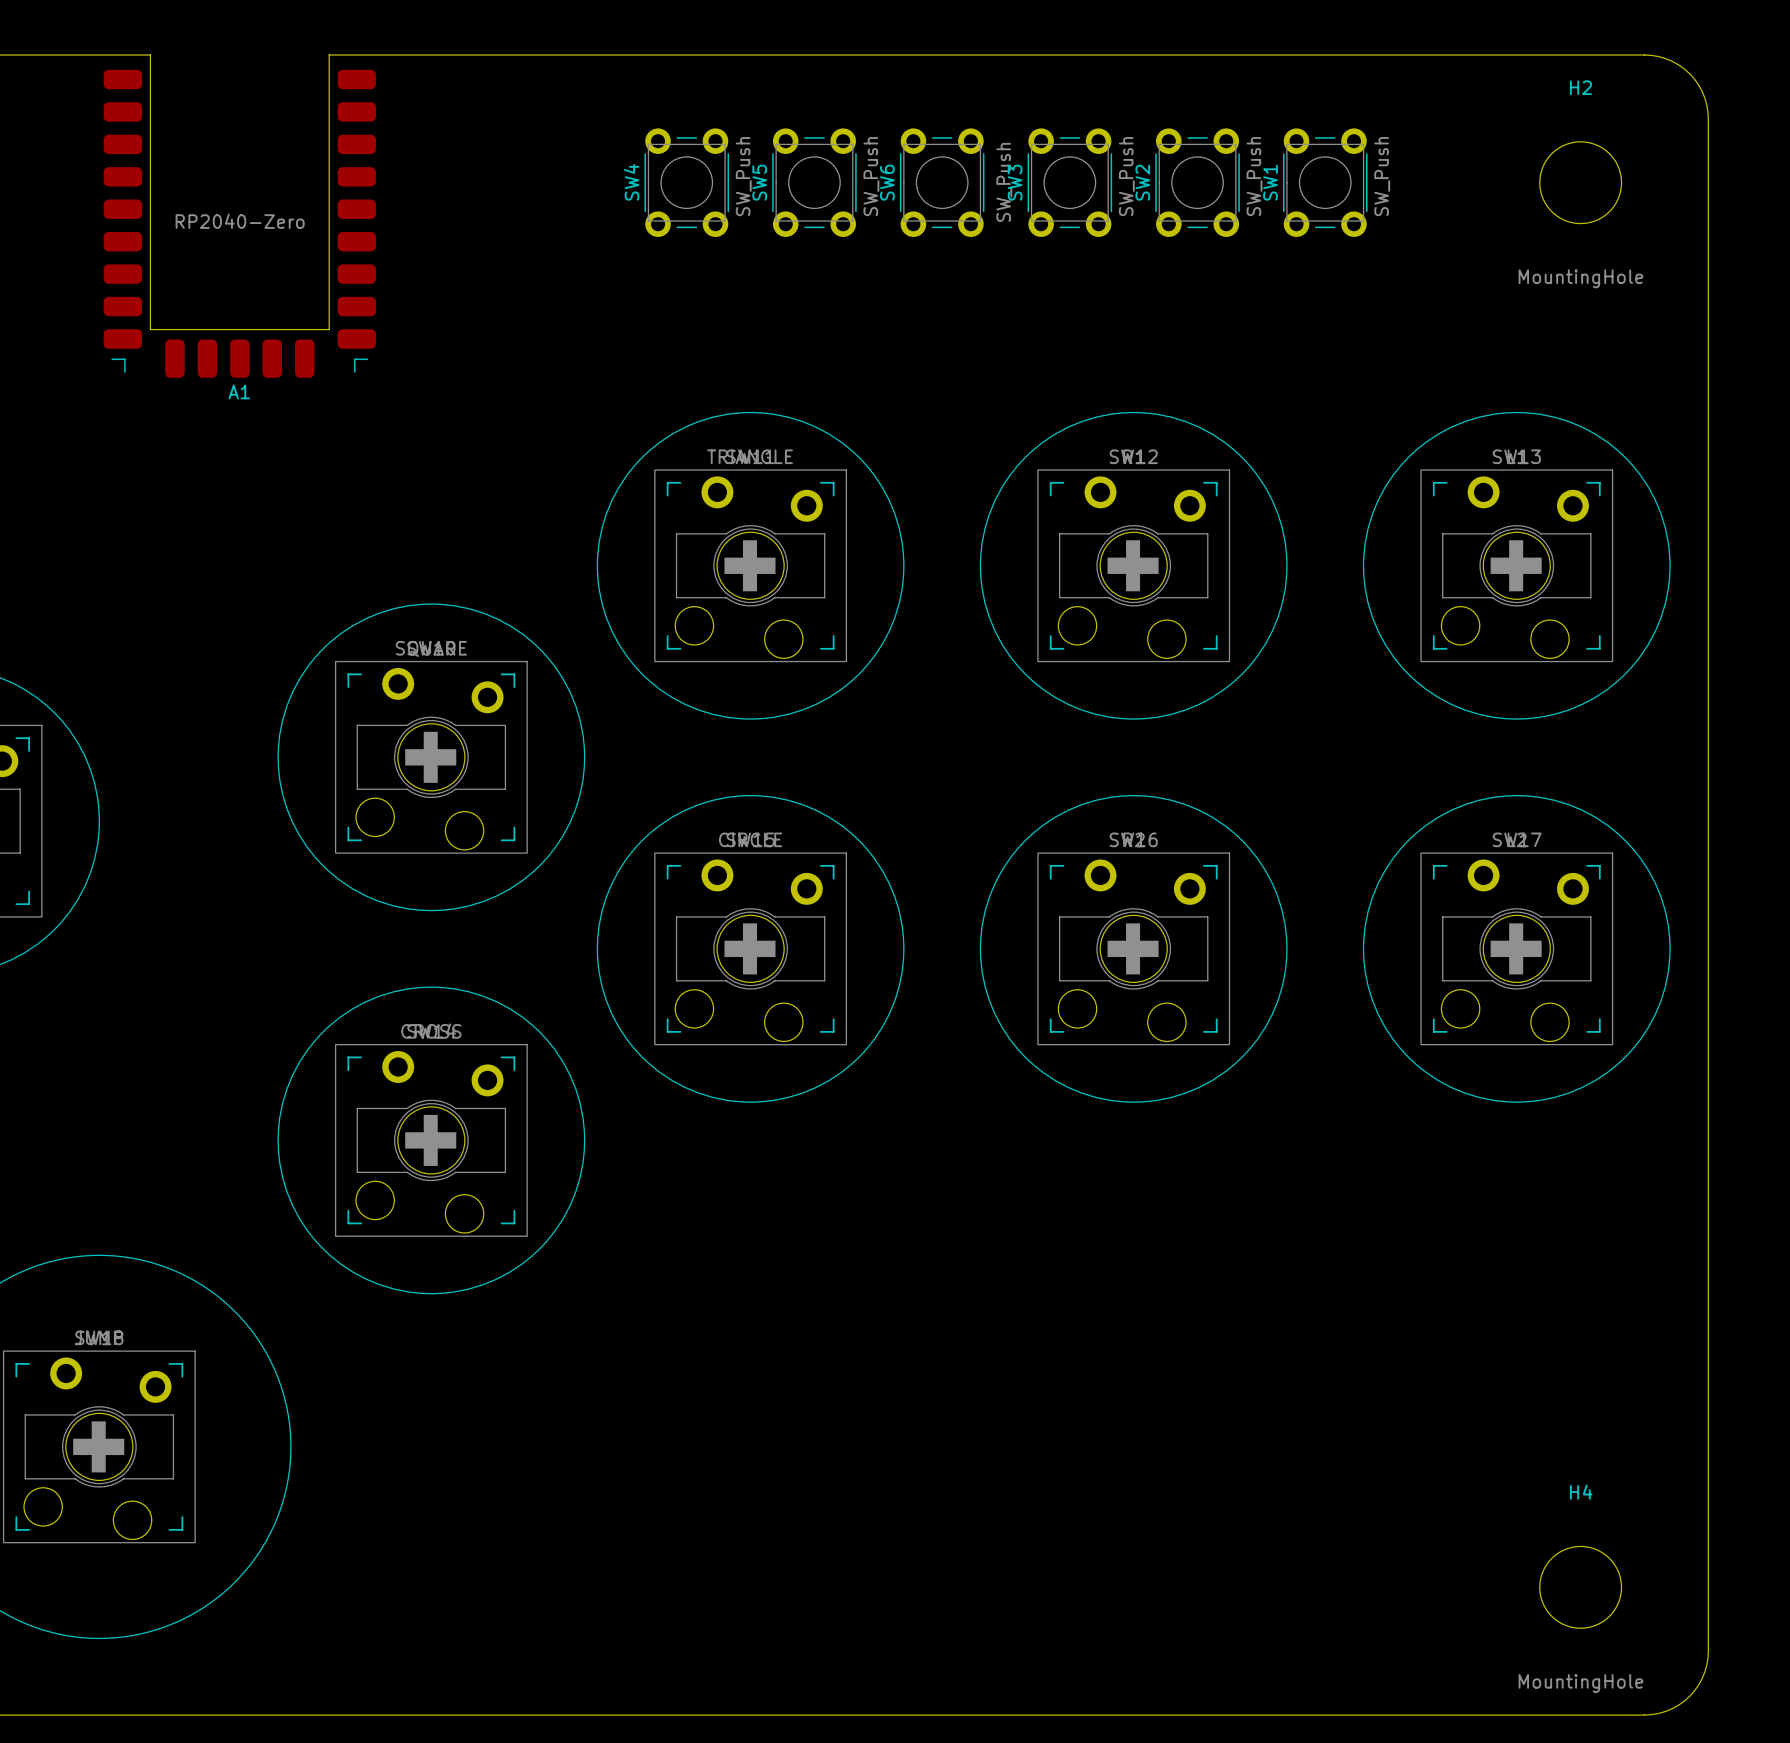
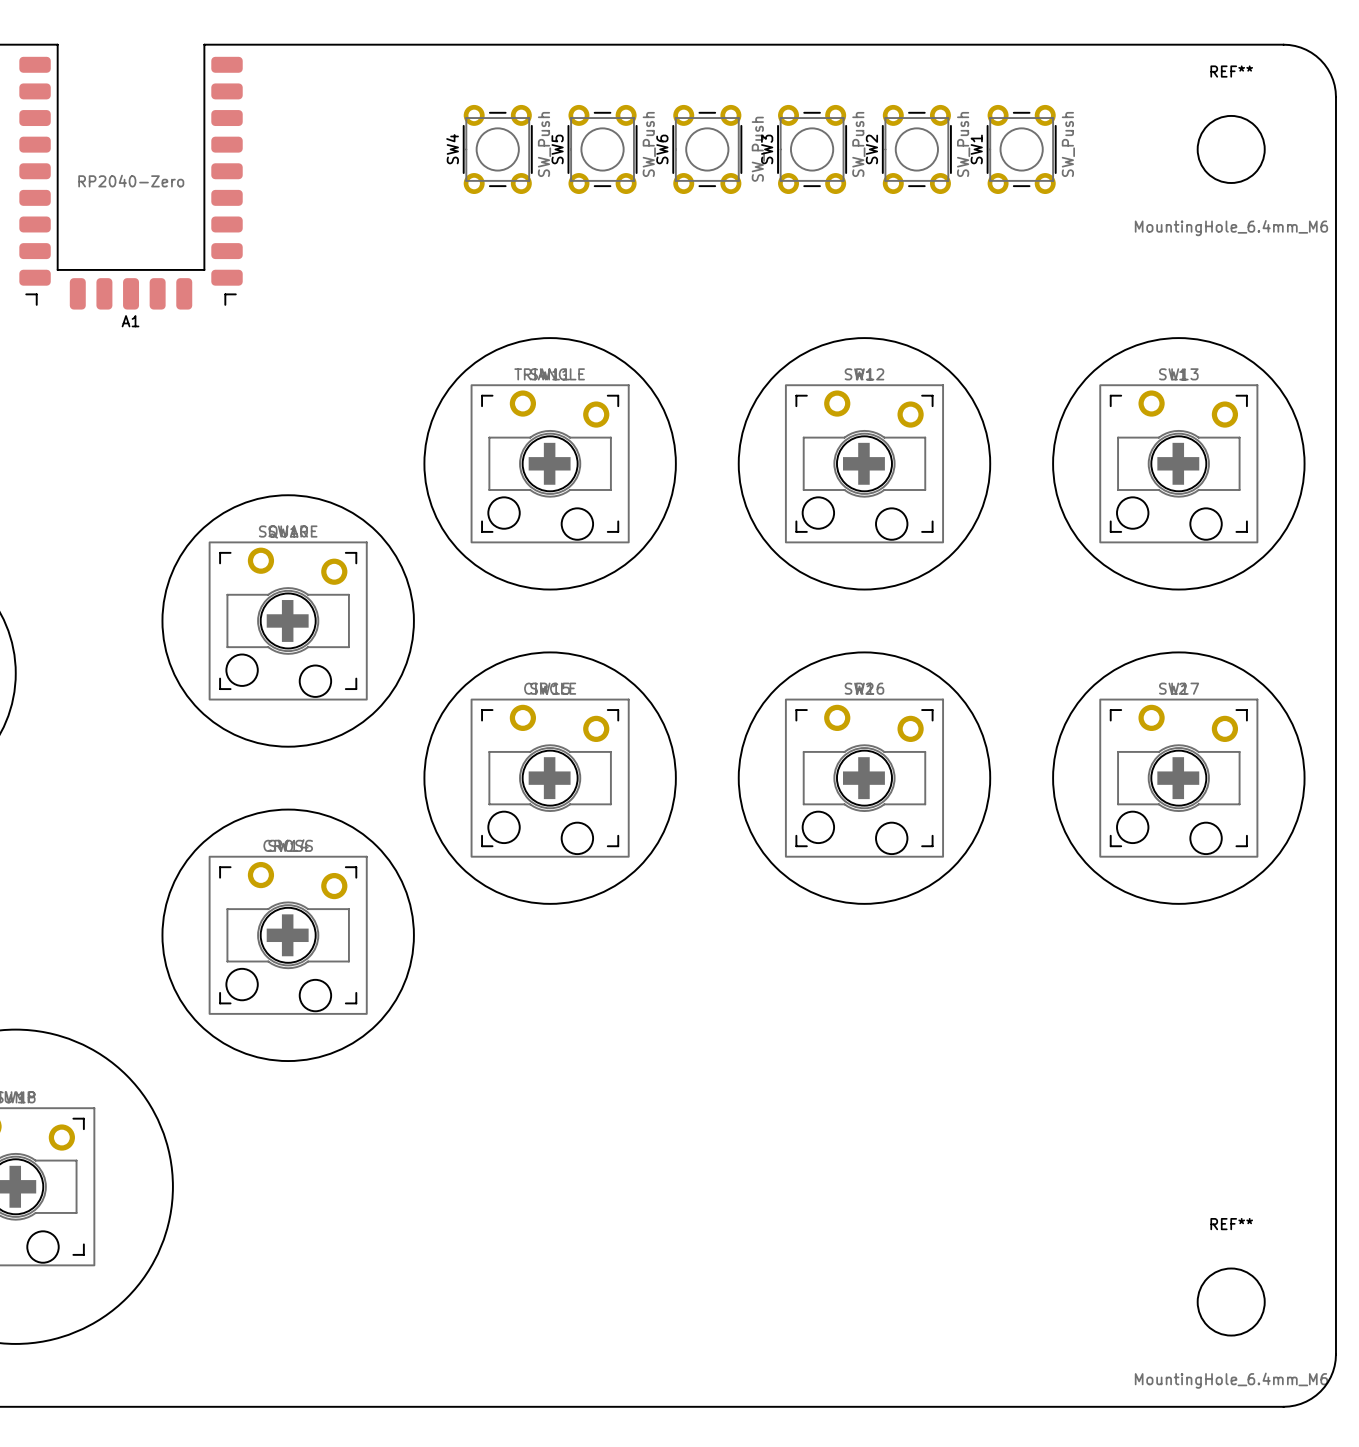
H2 name: H2 (1580, 87) -> REF** (1231, 71)
H2 value: MountingHole (1580, 278) -> MountingHole_6.4mm_M6 (1231, 228)
H4 name: H4 (1581, 1492) -> REF** (1231, 1224)
H4 value: MountingHole (1580, 1683) -> MountingHole_6.4mm_M6 (1231, 1380)

